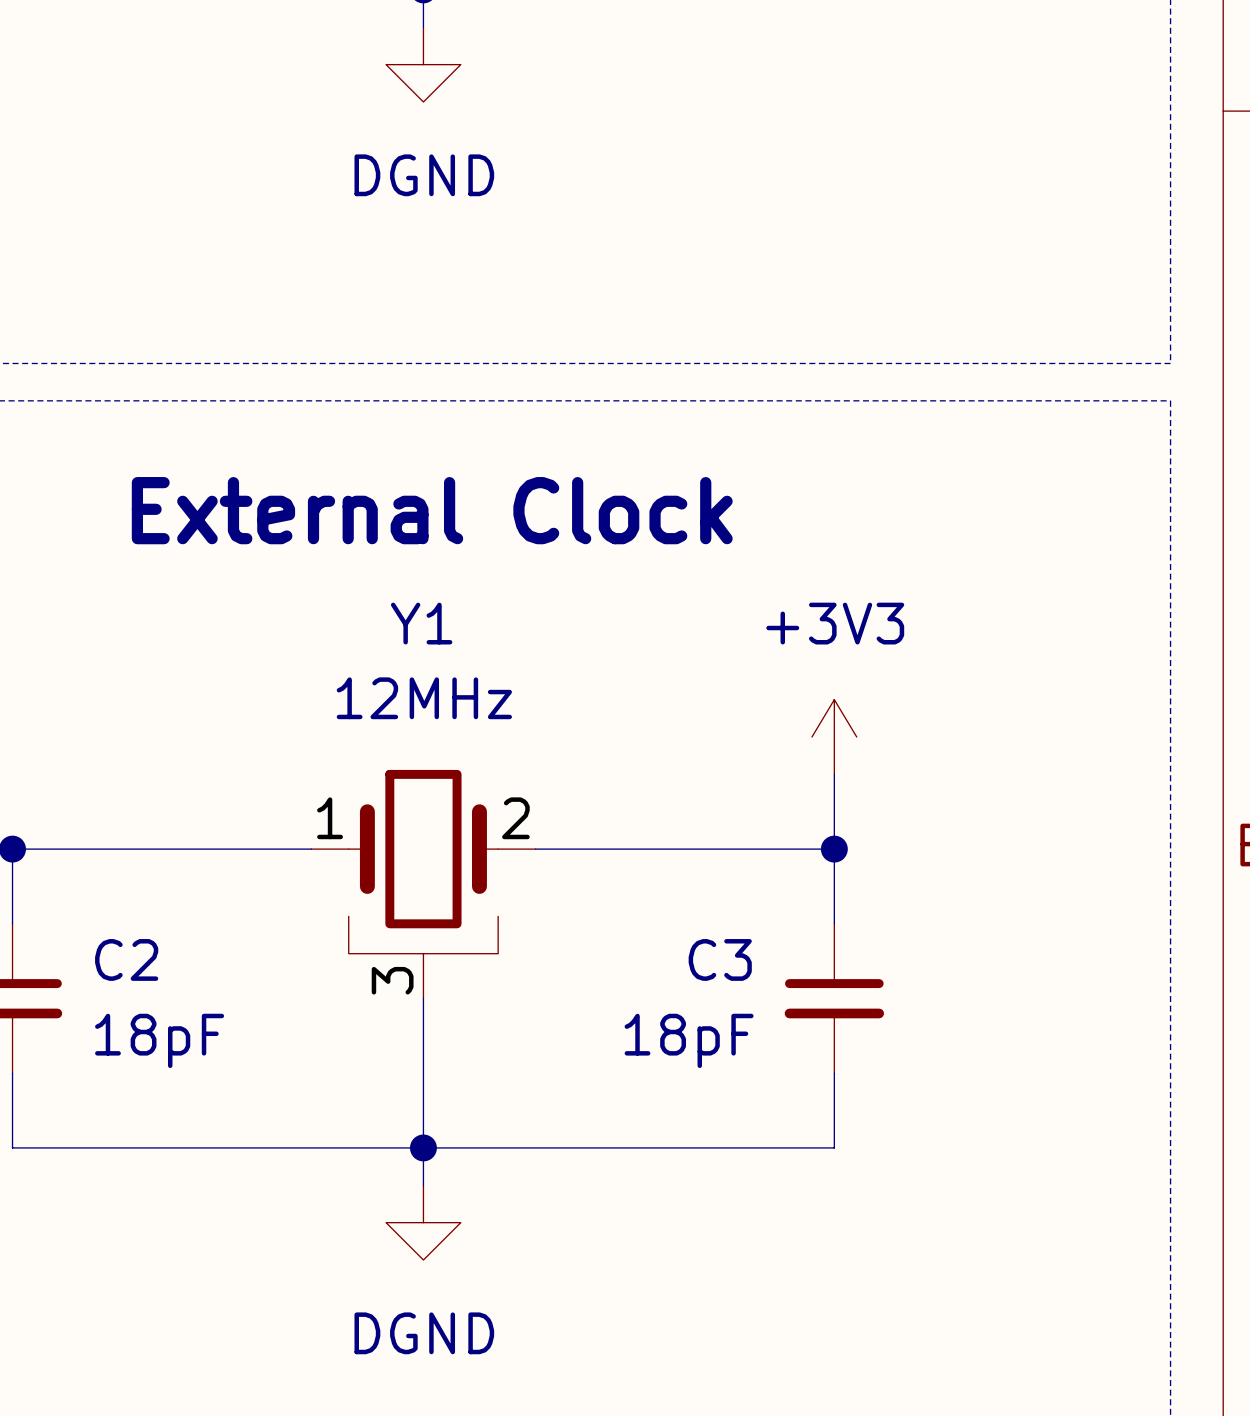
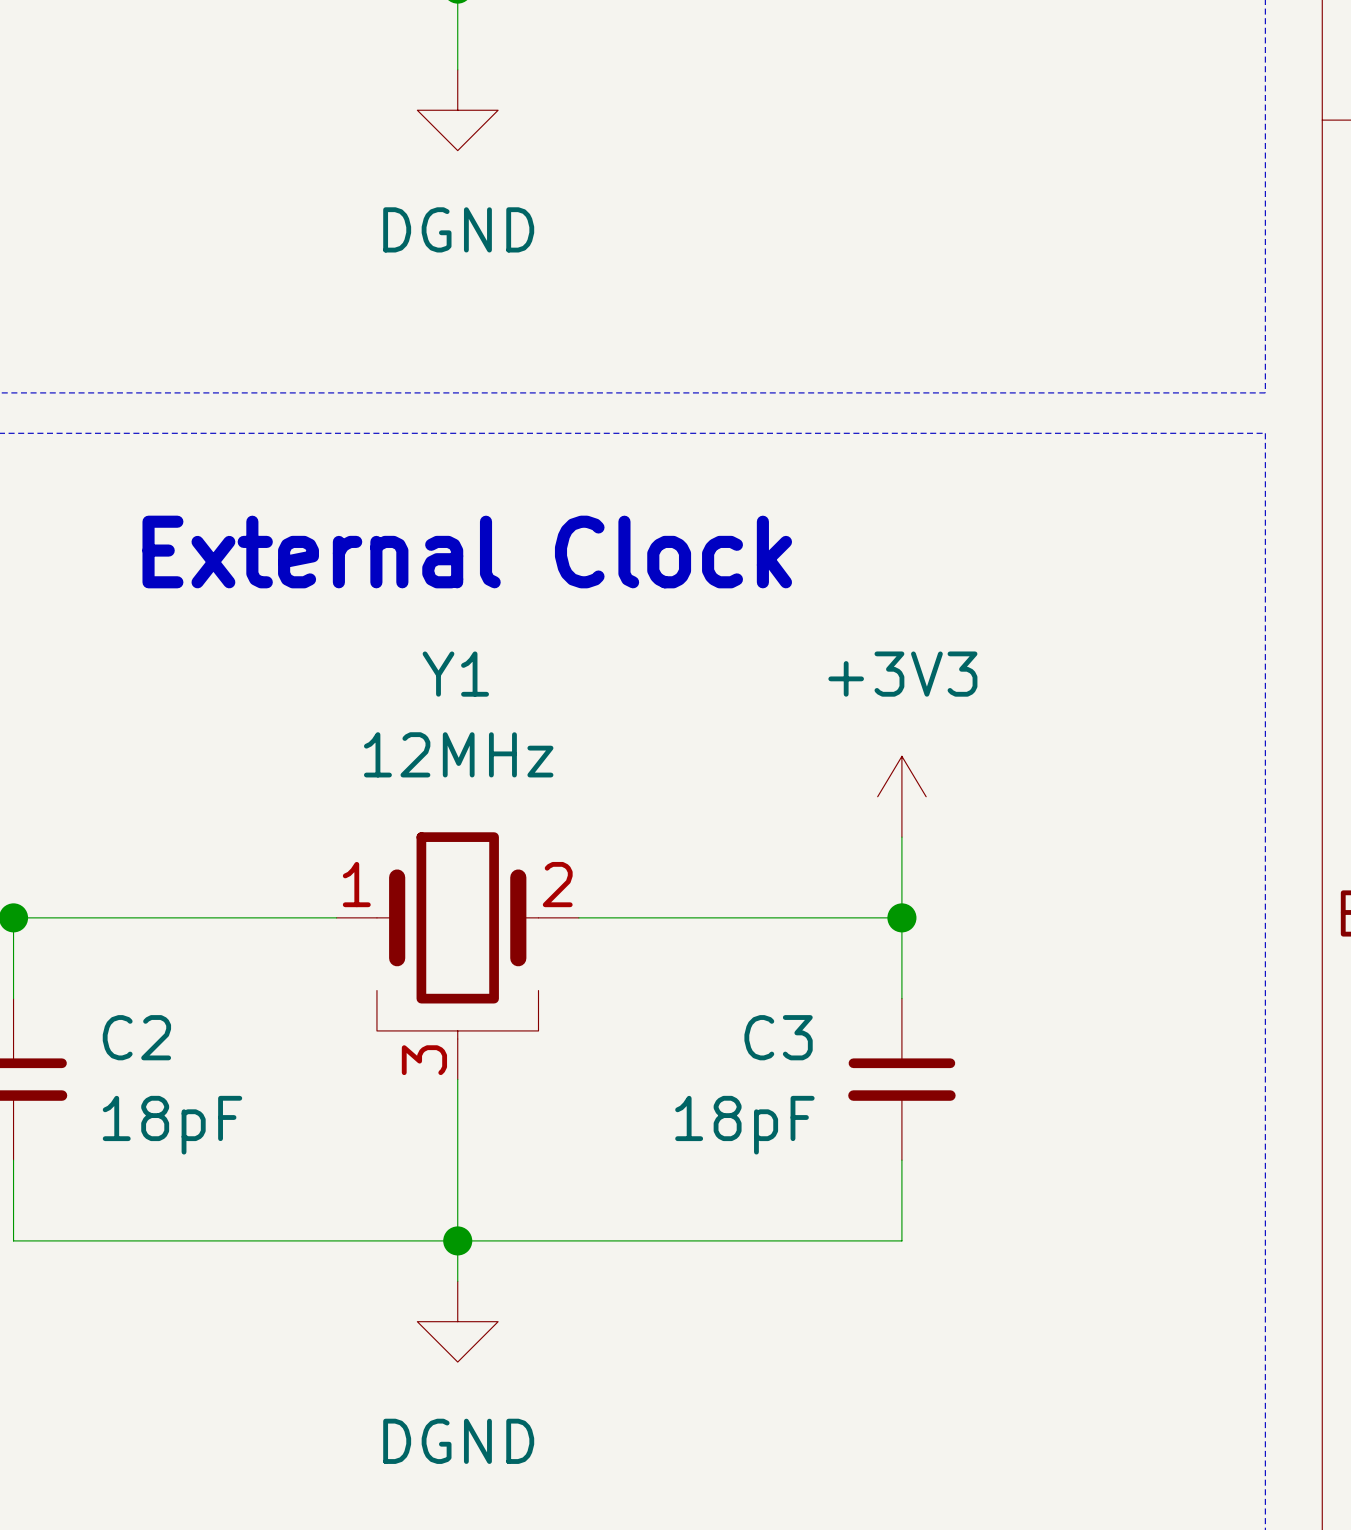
power symbol position: DGND (423, 64) -> DGND (457, 110)

